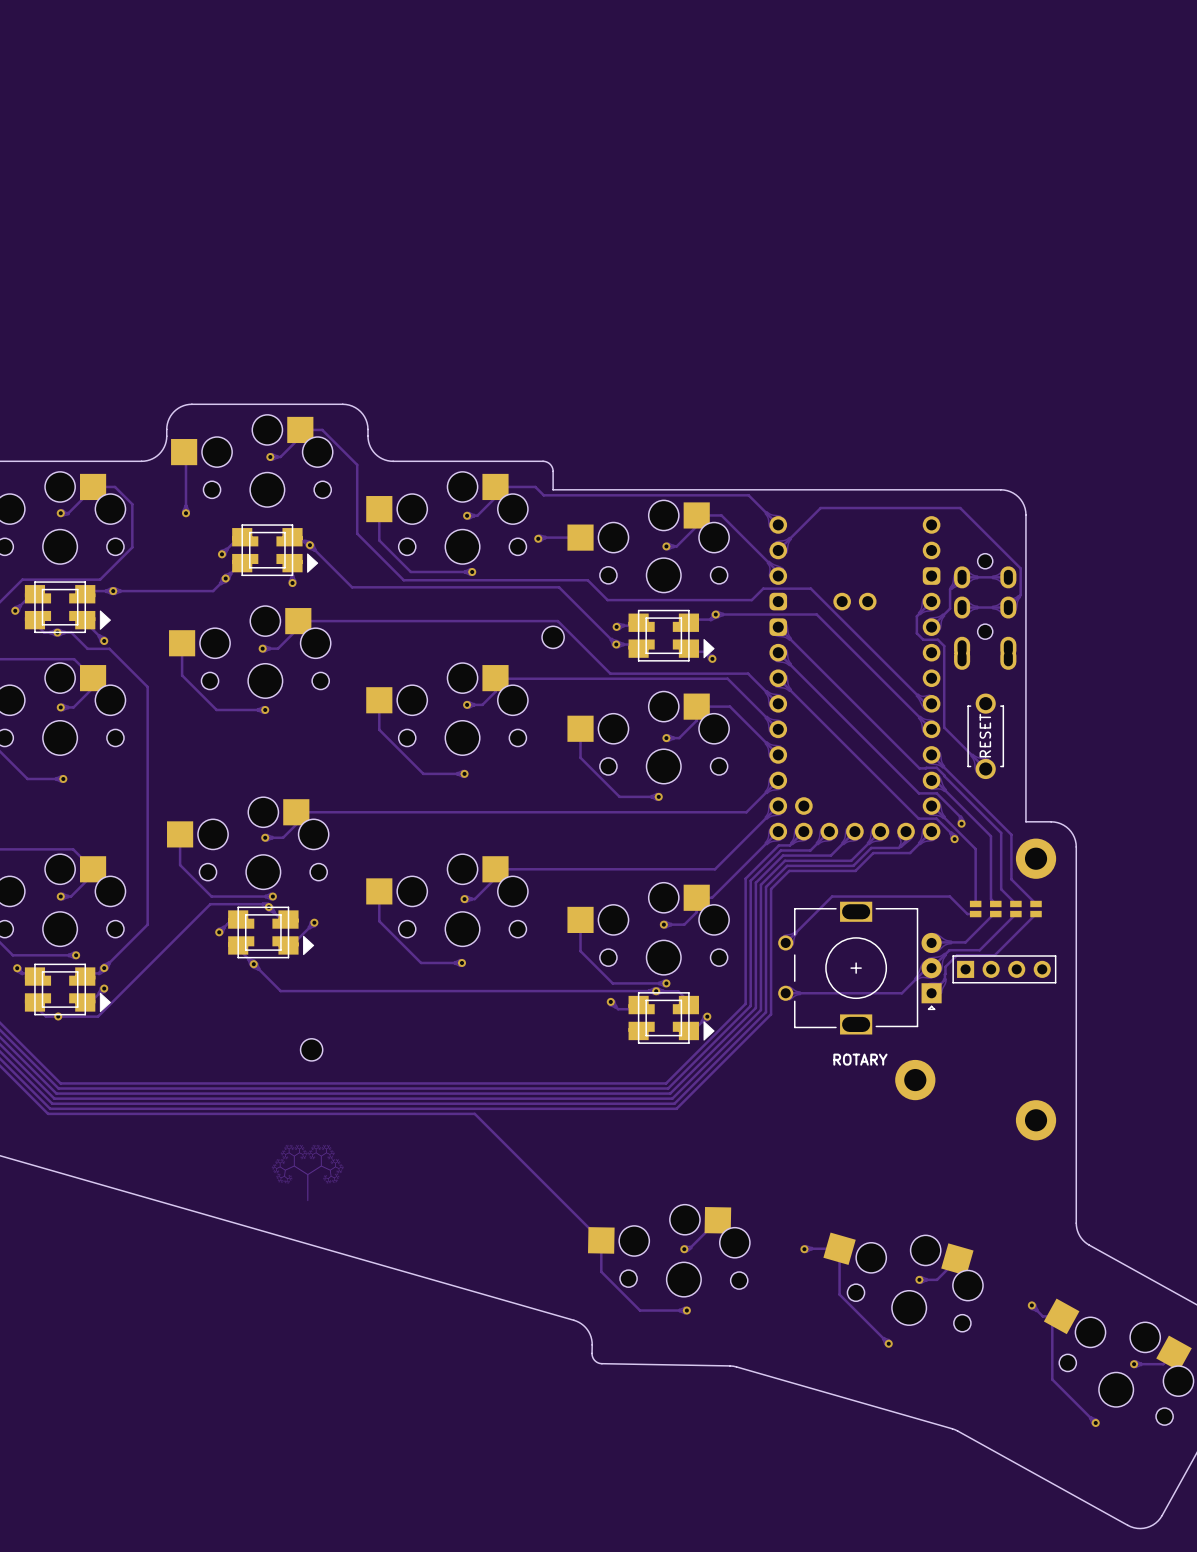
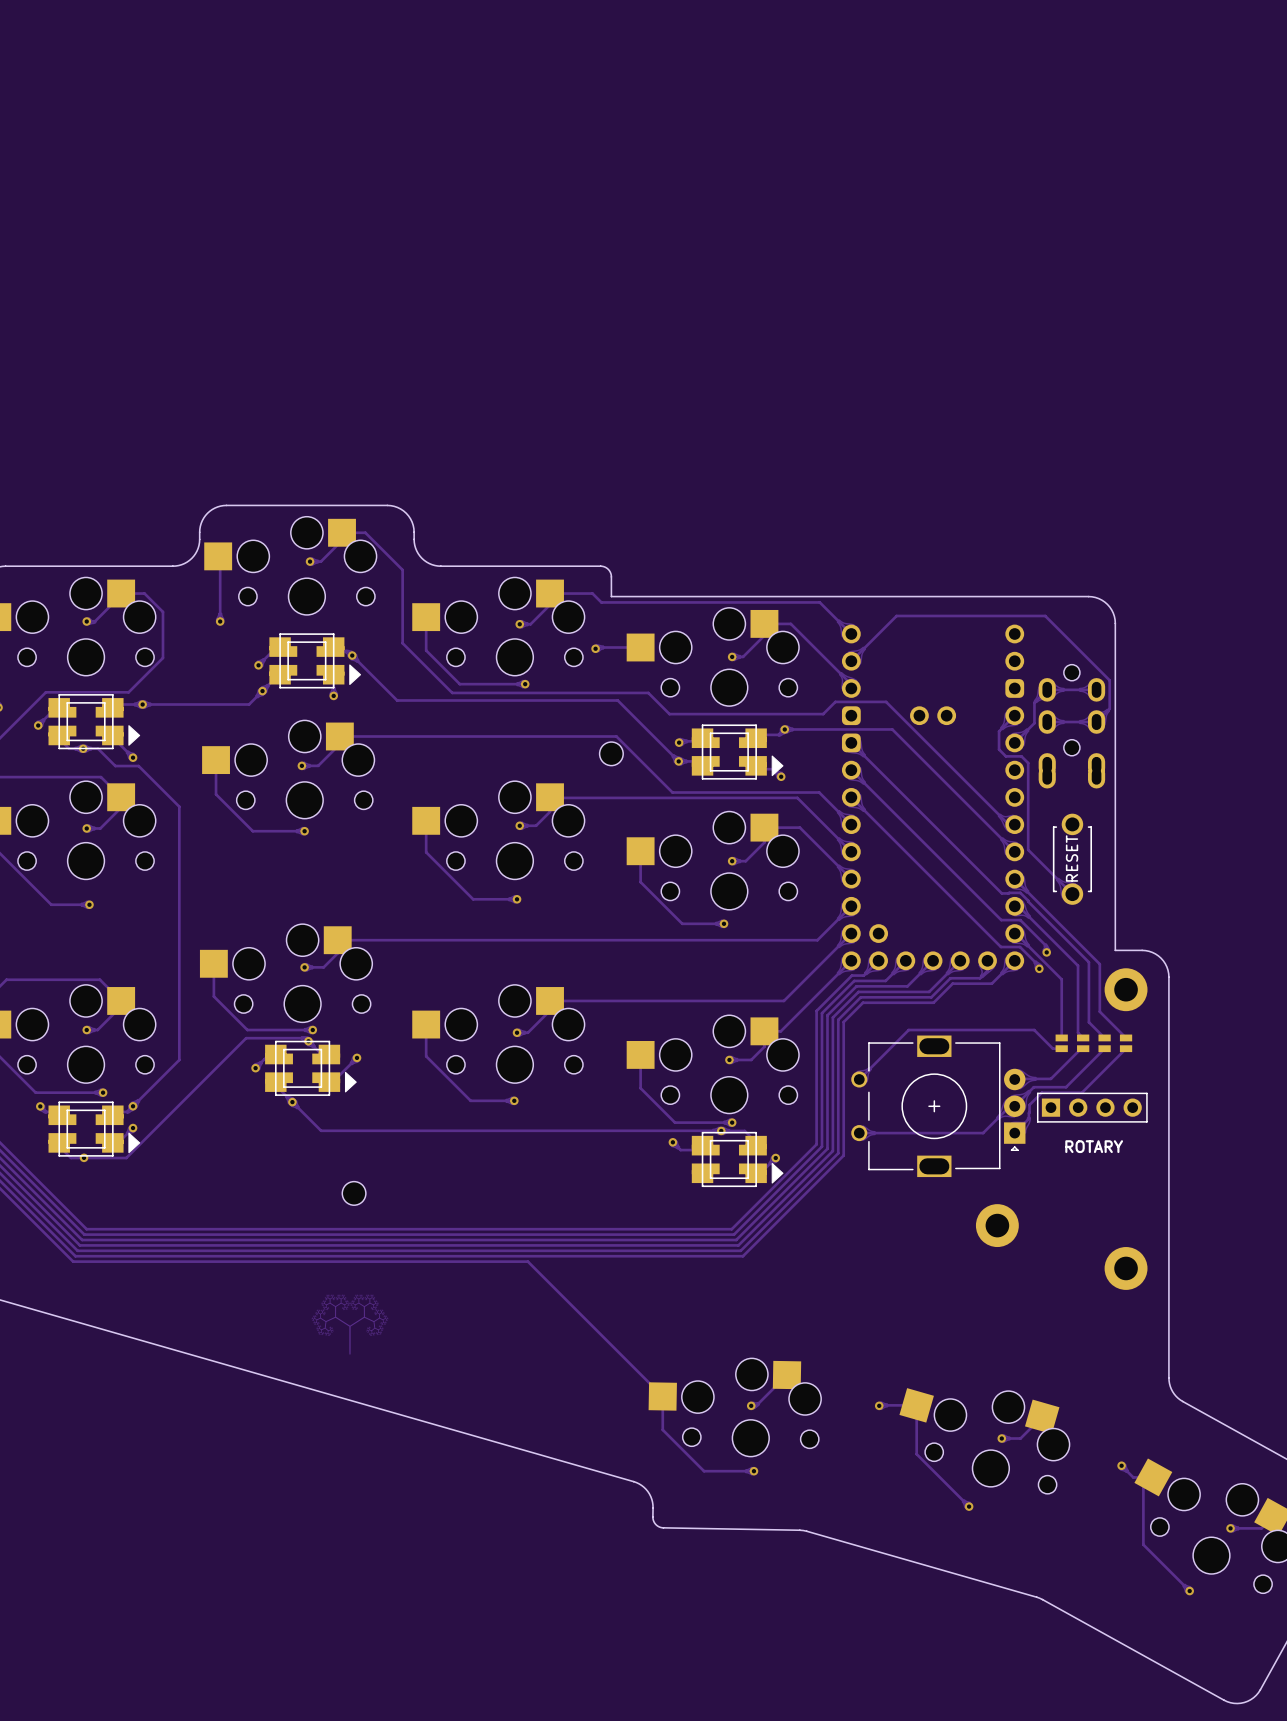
text position: ROTARY (860, 1059) -> ROTARY (1094, 1146)

